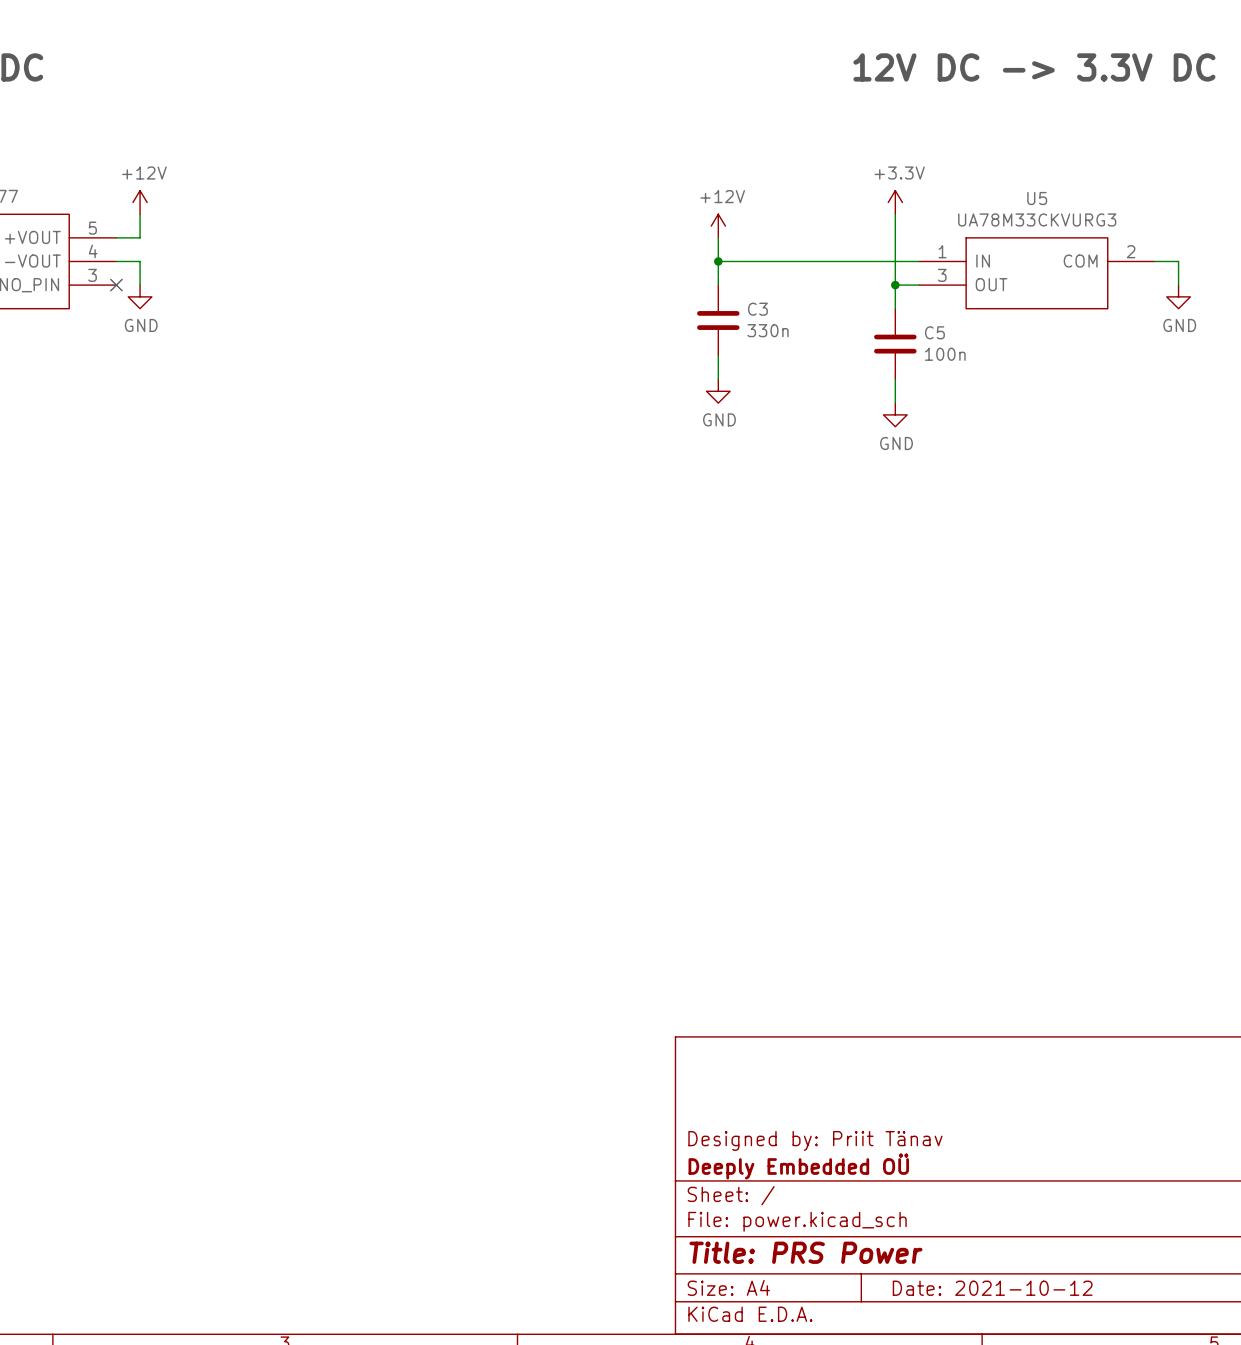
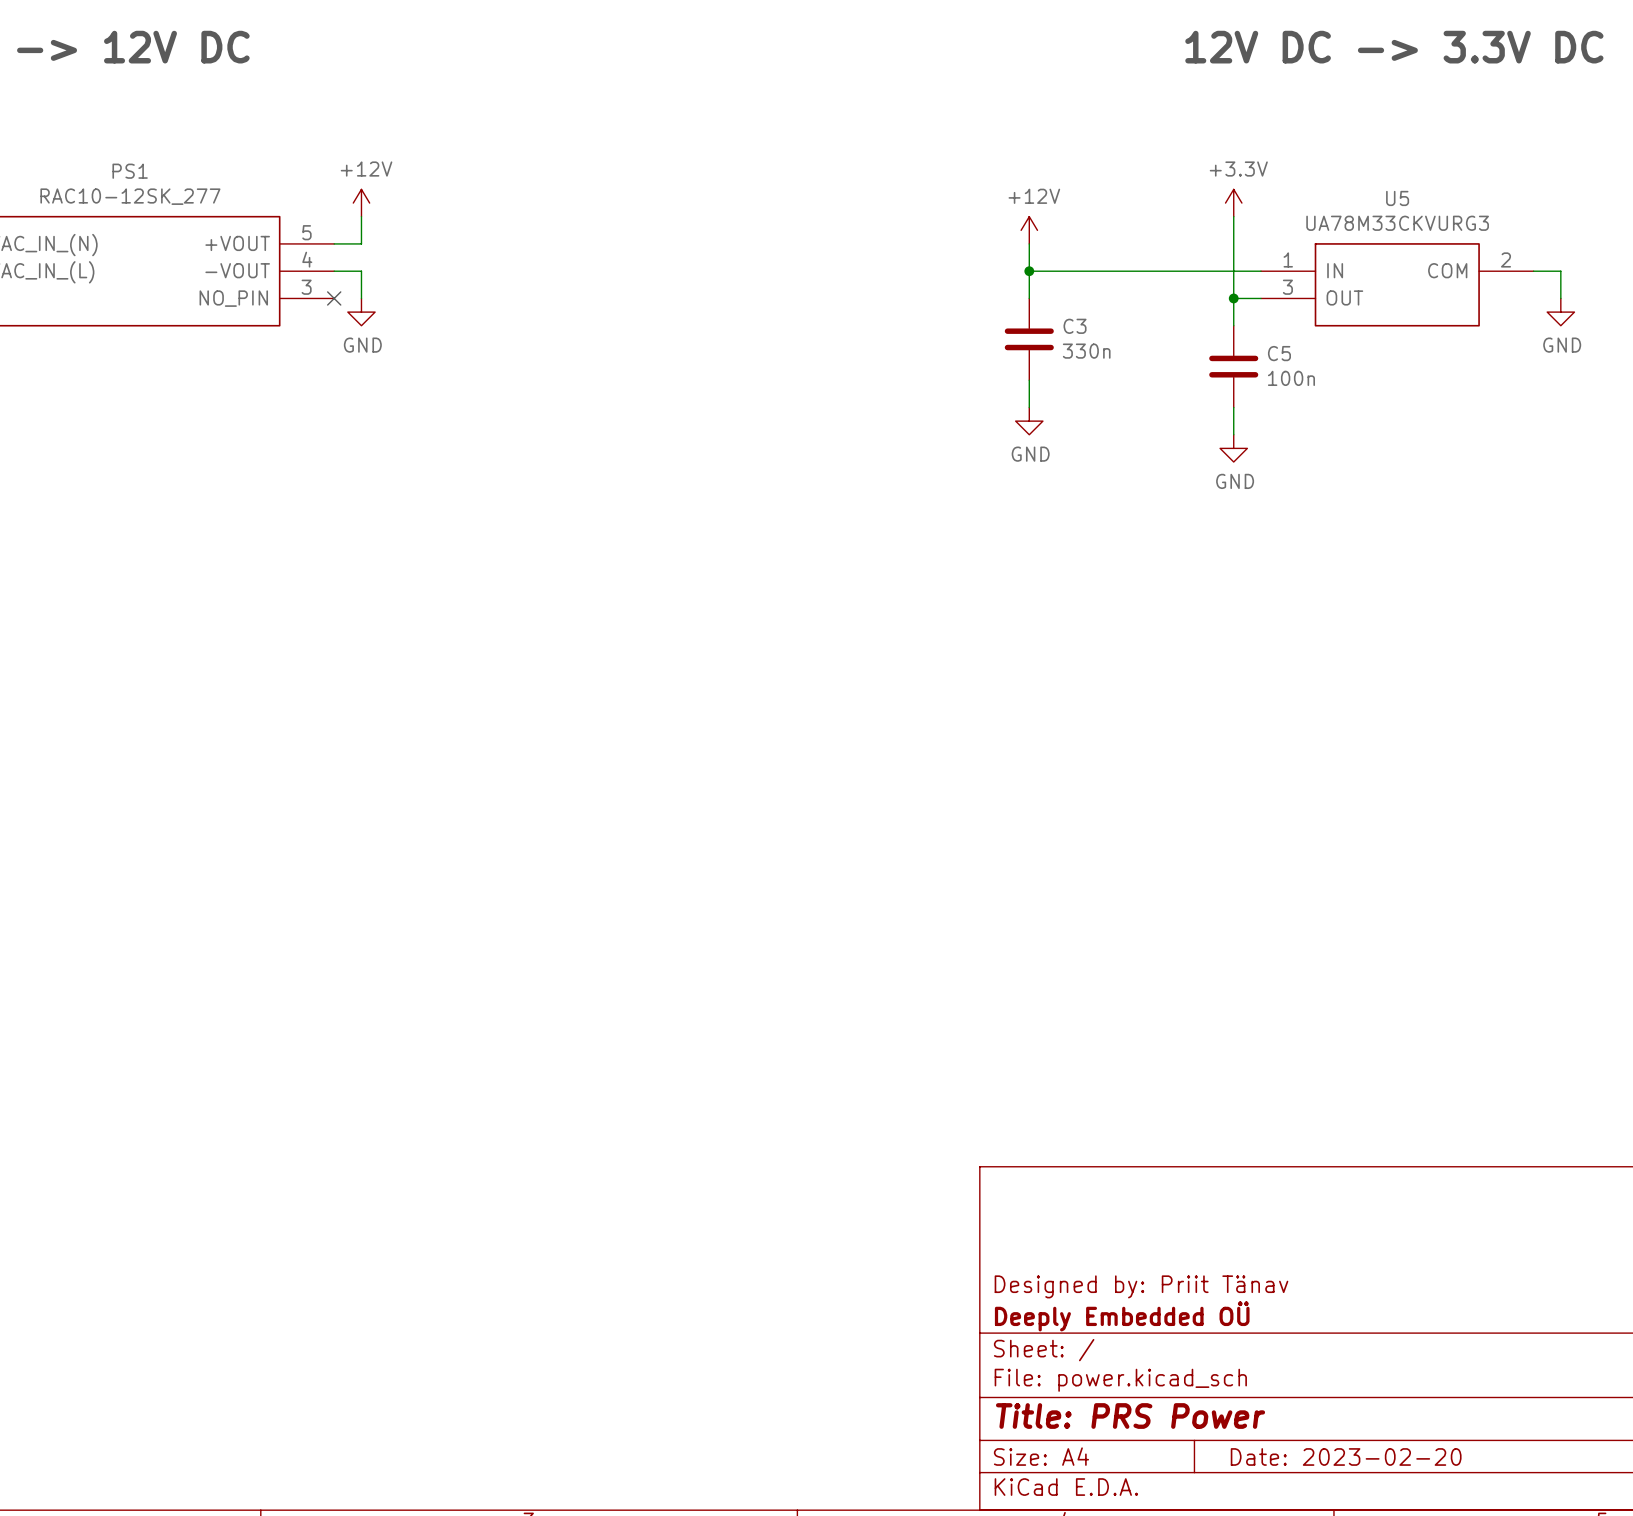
title block: Date: 2021-10-12 (992, 1288) -> Date: 2023-02-20 (1346, 1456)

